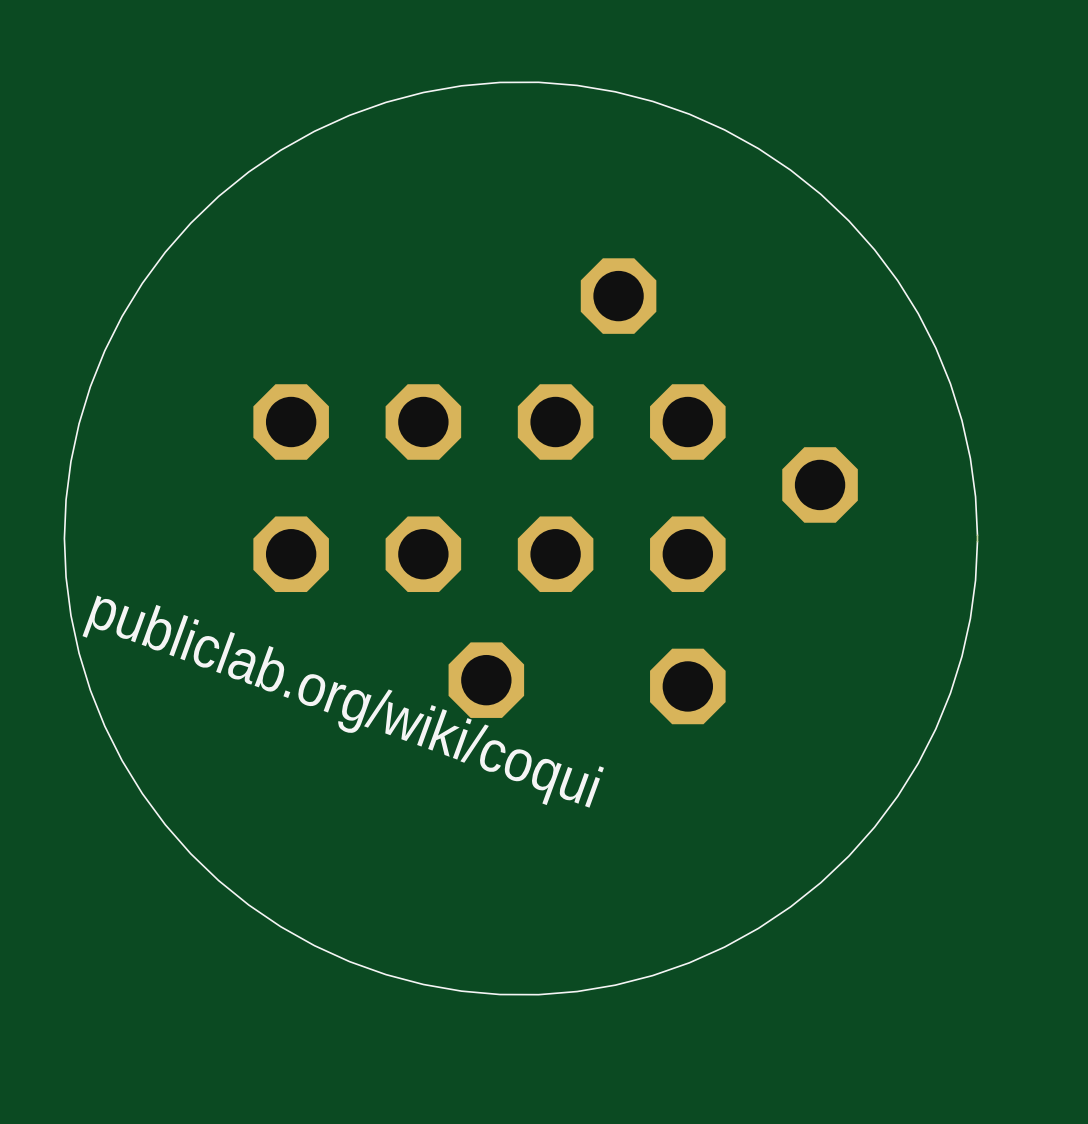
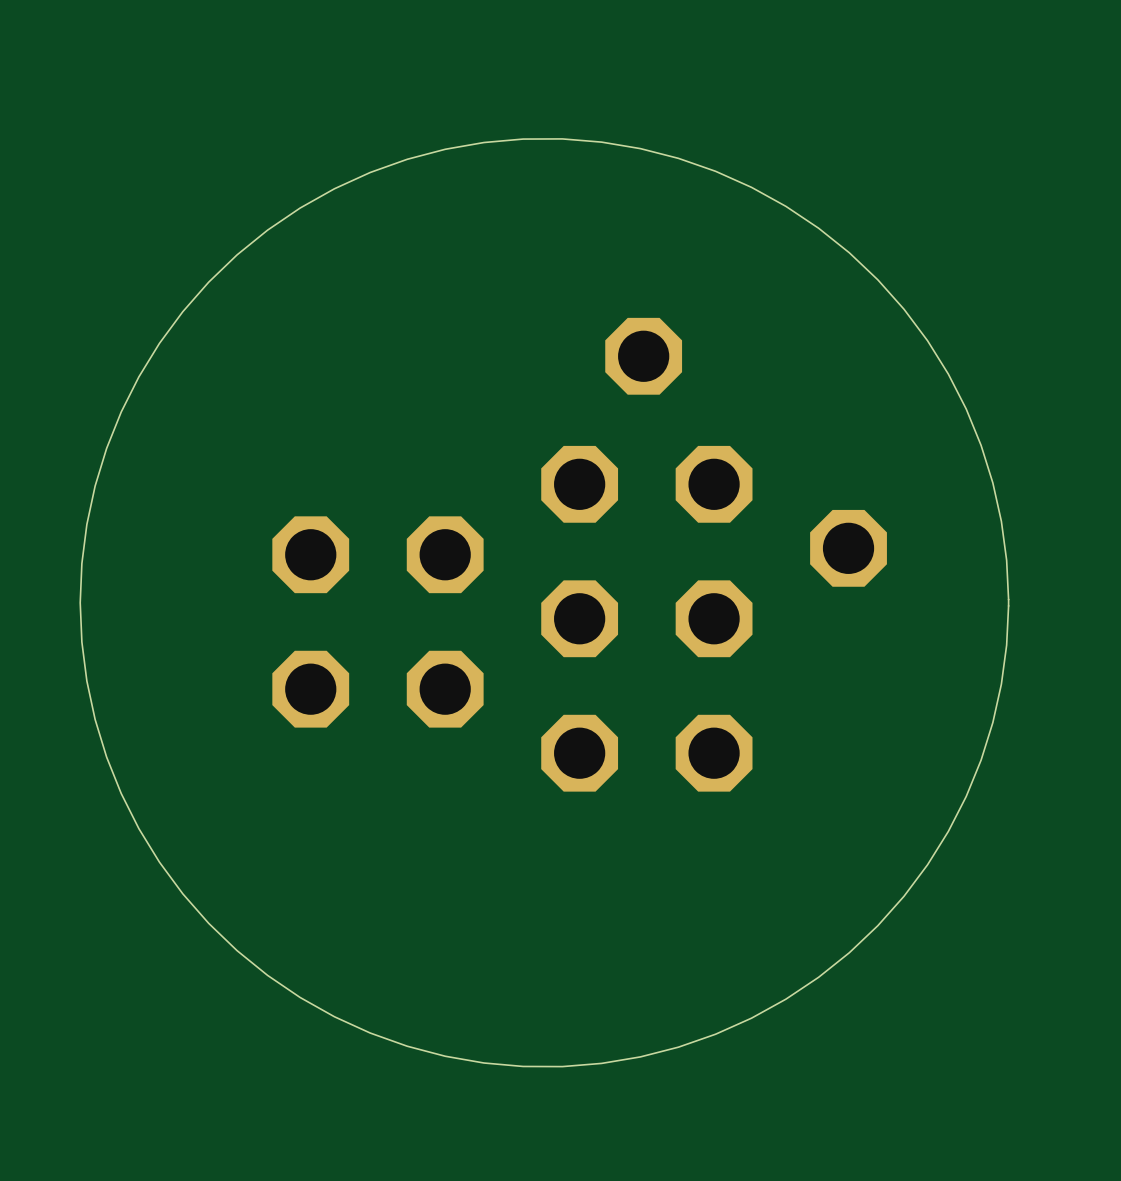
part: (291, 422) -> none
part: (423, 422) -> none
part: none -> (310, 554)
part: none -> (445, 554)
board edge: none -> (1008, 599) (1006, 560) (1001, 521) (992, 482) (981, 445) (966, 409) (948, 374) (927, 340) (903, 309) (877, 279) (849, 252) (818, 228) (785, 206) (751, 187) (715, 171) (678, 158) (640, 148) (601, 142) (562, 138) (523, 139) (483, 142) (445, 149) (407, 159) (370, 172) (334, 188) (300, 208) (267, 230) (237, 254) (208, 282) (182, 311) (159, 343) (138, 376) (121, 411) (106, 448) (95, 486) (86, 524) (81, 563) (80, 602) (81, 642) (86, 681) (95, 719) (106, 757) (121, 793) (138, 828) (159, 862) (182, 893) (208, 923) (237, 950) (267, 975) (300, 997) (334, 1016) (370, 1033) (407, 1046) (445, 1056) (483, 1063) (523, 1066) (562, 1066) (601, 1063) (640, 1056) (678, 1047) (715, 1034) (751, 1018) (785, 999) (818, 977) (849, 952) (877, 925) (903, 896) (927, 864) (948, 831) (966, 796) (981, 760) (992, 722) (1001, 684) (1006, 645) (1008, 605)
line: (977, 535) (975, 496) (970, 458) (962, 420) (950, 383) (935, 347) (918, 313) (897, 280) (874, 249) (848, 220) (820, 194) (790, 170) (758, 148) (724, 129) (689, 114) (652, 101) (615, 91) (577, 85) (538, 82) (500, 82) (461, 85) (423, 92) (386, 102) (349, 115) (314, 131) (280, 150) (248, 172) (218, 196) (190, 223) (165, 252) (142, 283) (122, 316) (104, 350) (90, 386) (79, 423) (70, 461) (66, 499) (64, 538) (66, 577) (70, 615) (79, 653) (90, 690) (104, 726) (122, 760) (142, 793) (165, 824) (190, 853) (218, 880) (248, 904) (280, 926) (314, 945) (349, 961) (386, 974) (423, 984) (461, 991) (500, 994) (538, 994) (577, 991) (615, 985) (652, 975) (689, 962) (724, 947) (758, 928) (790, 906) (820, 882) (848, 856) (874, 827) (897, 796) (918, 763) (935, 729) (950, 693) (962, 656) (970, 618) (975, 580) (977, 541) -> none
part: (291, 554) -> none
part: (423, 554) -> none
part: none -> (310, 689)
part: none -> (445, 689)
part: (486, 680) -> none
part: none -> (579, 753)
text: publiclab.org/wiki/coqui (343, 701) -> none

